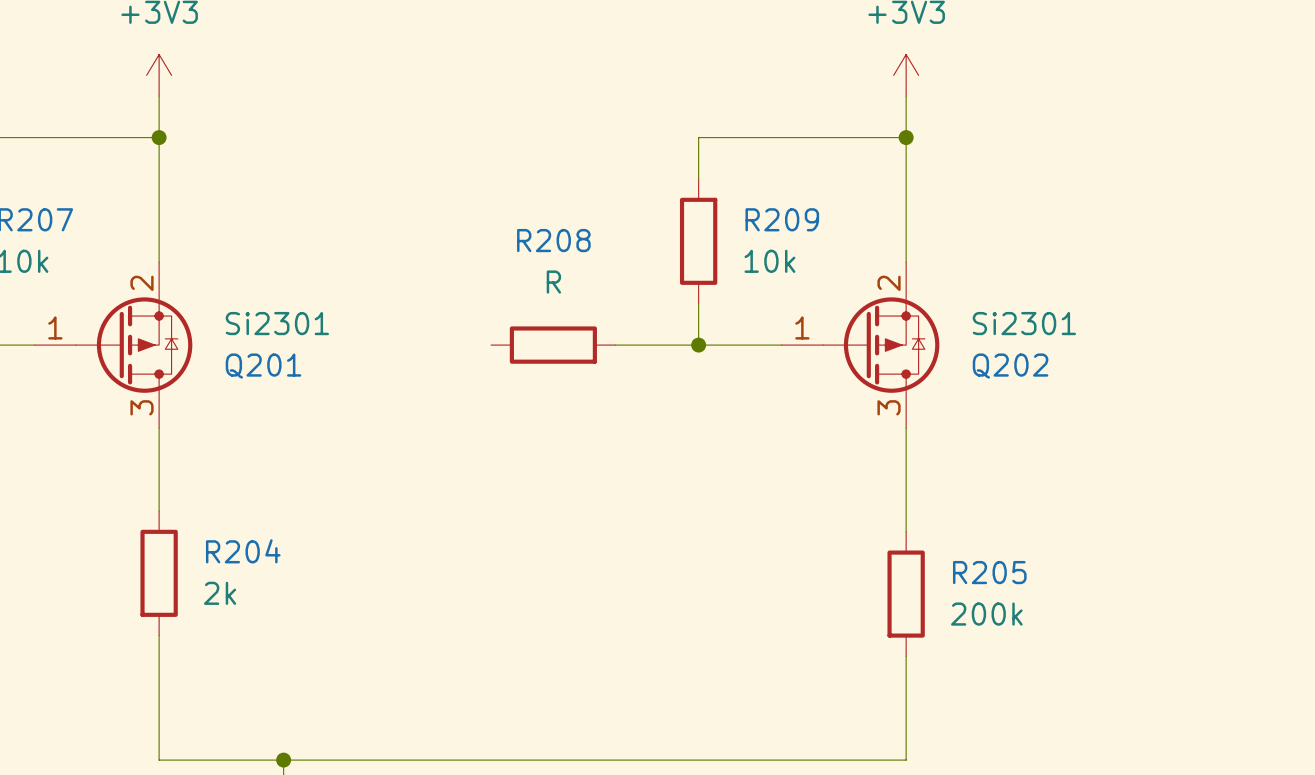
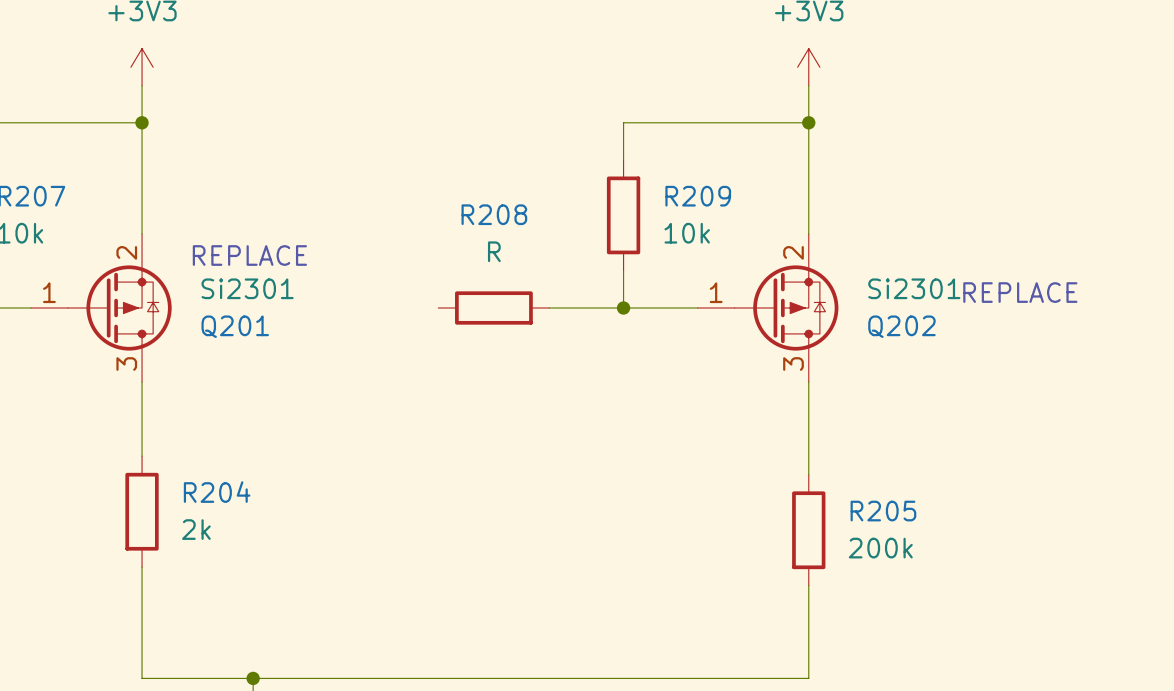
text: none -> REPLACE (249, 255)
text: none -> REPLACE (1020, 292)

